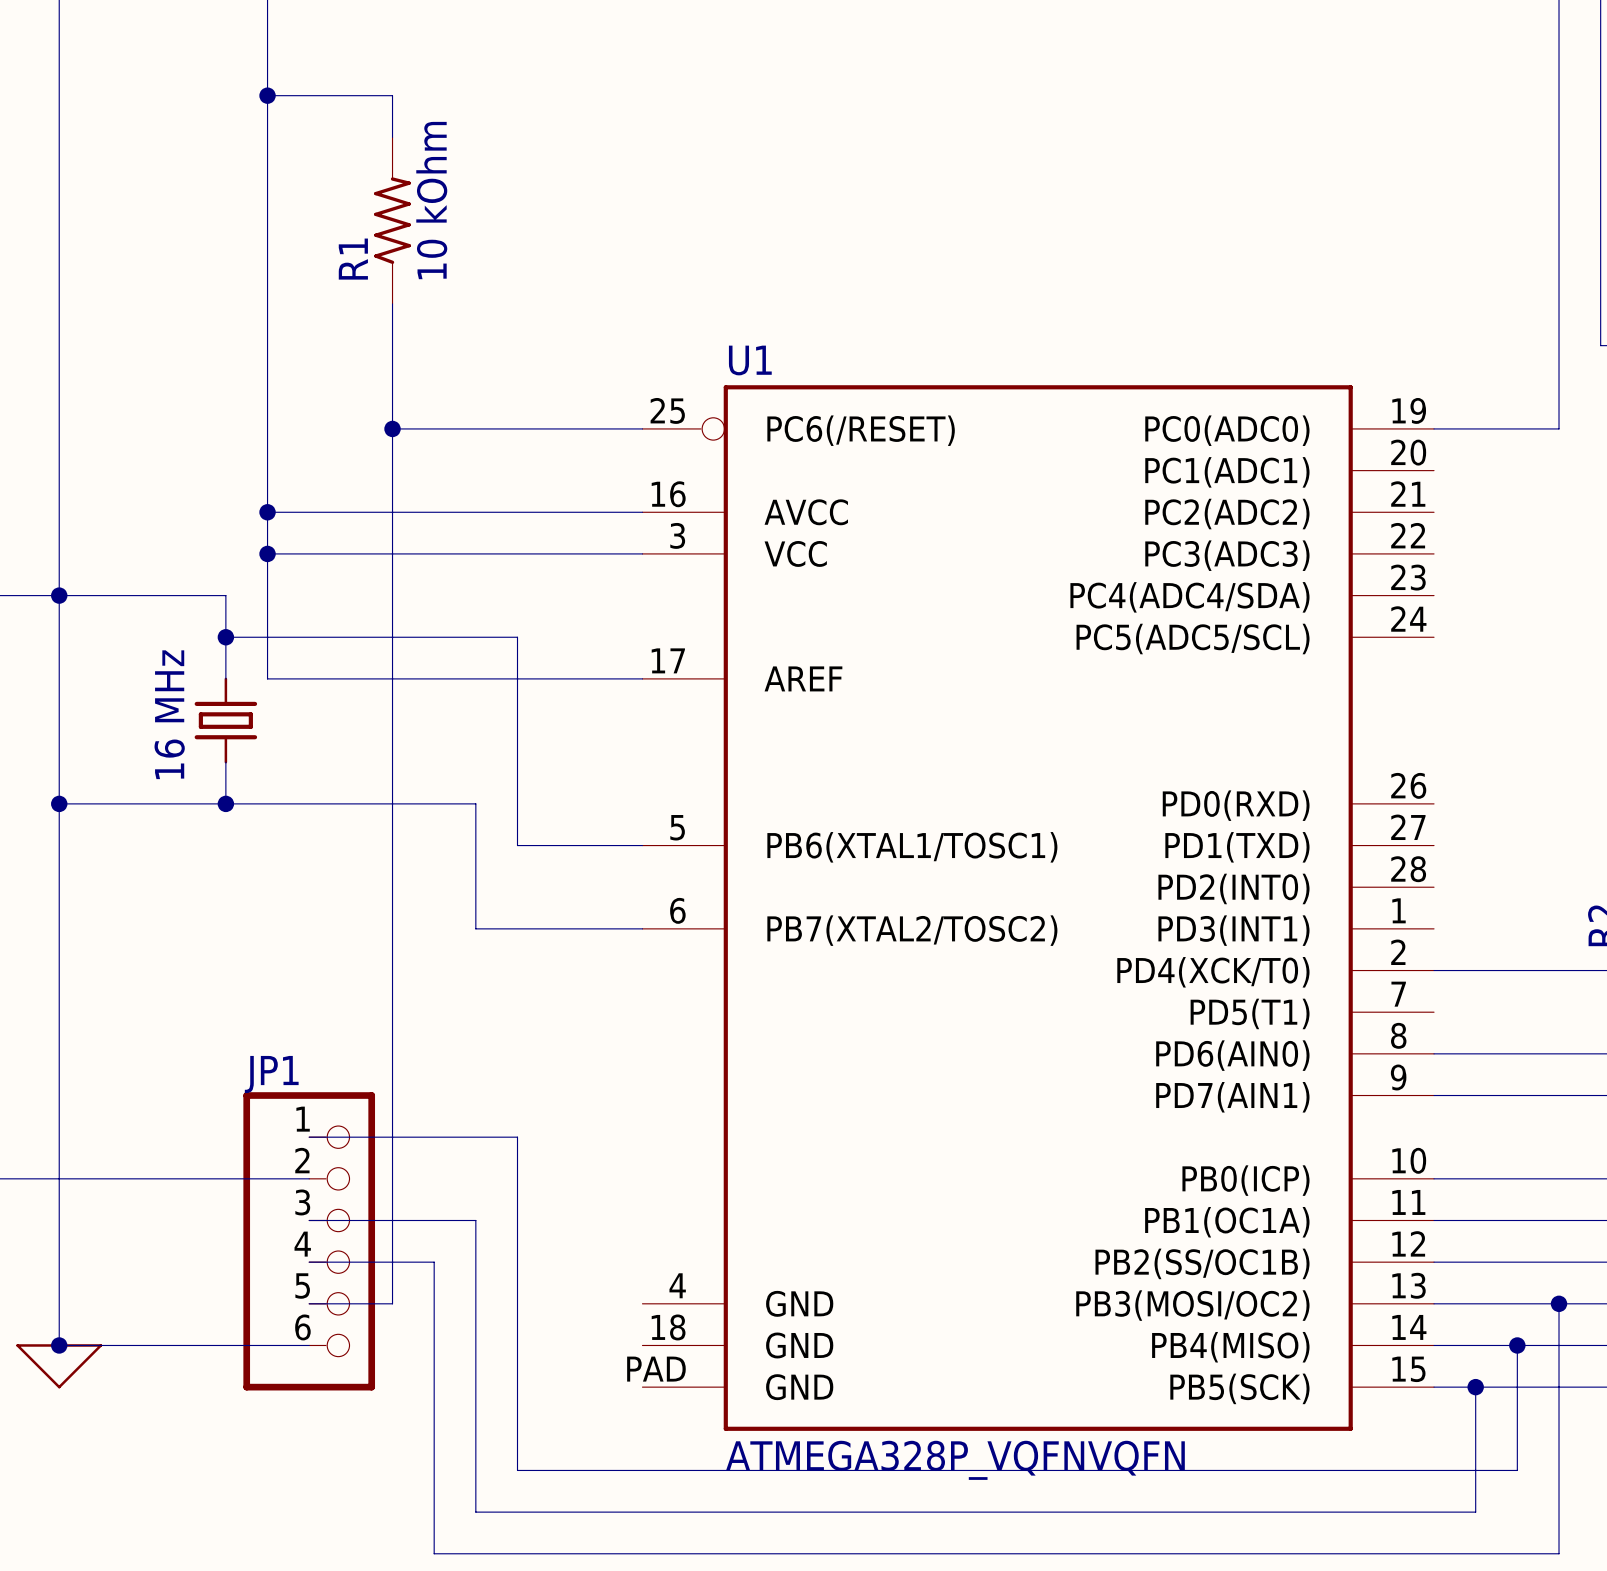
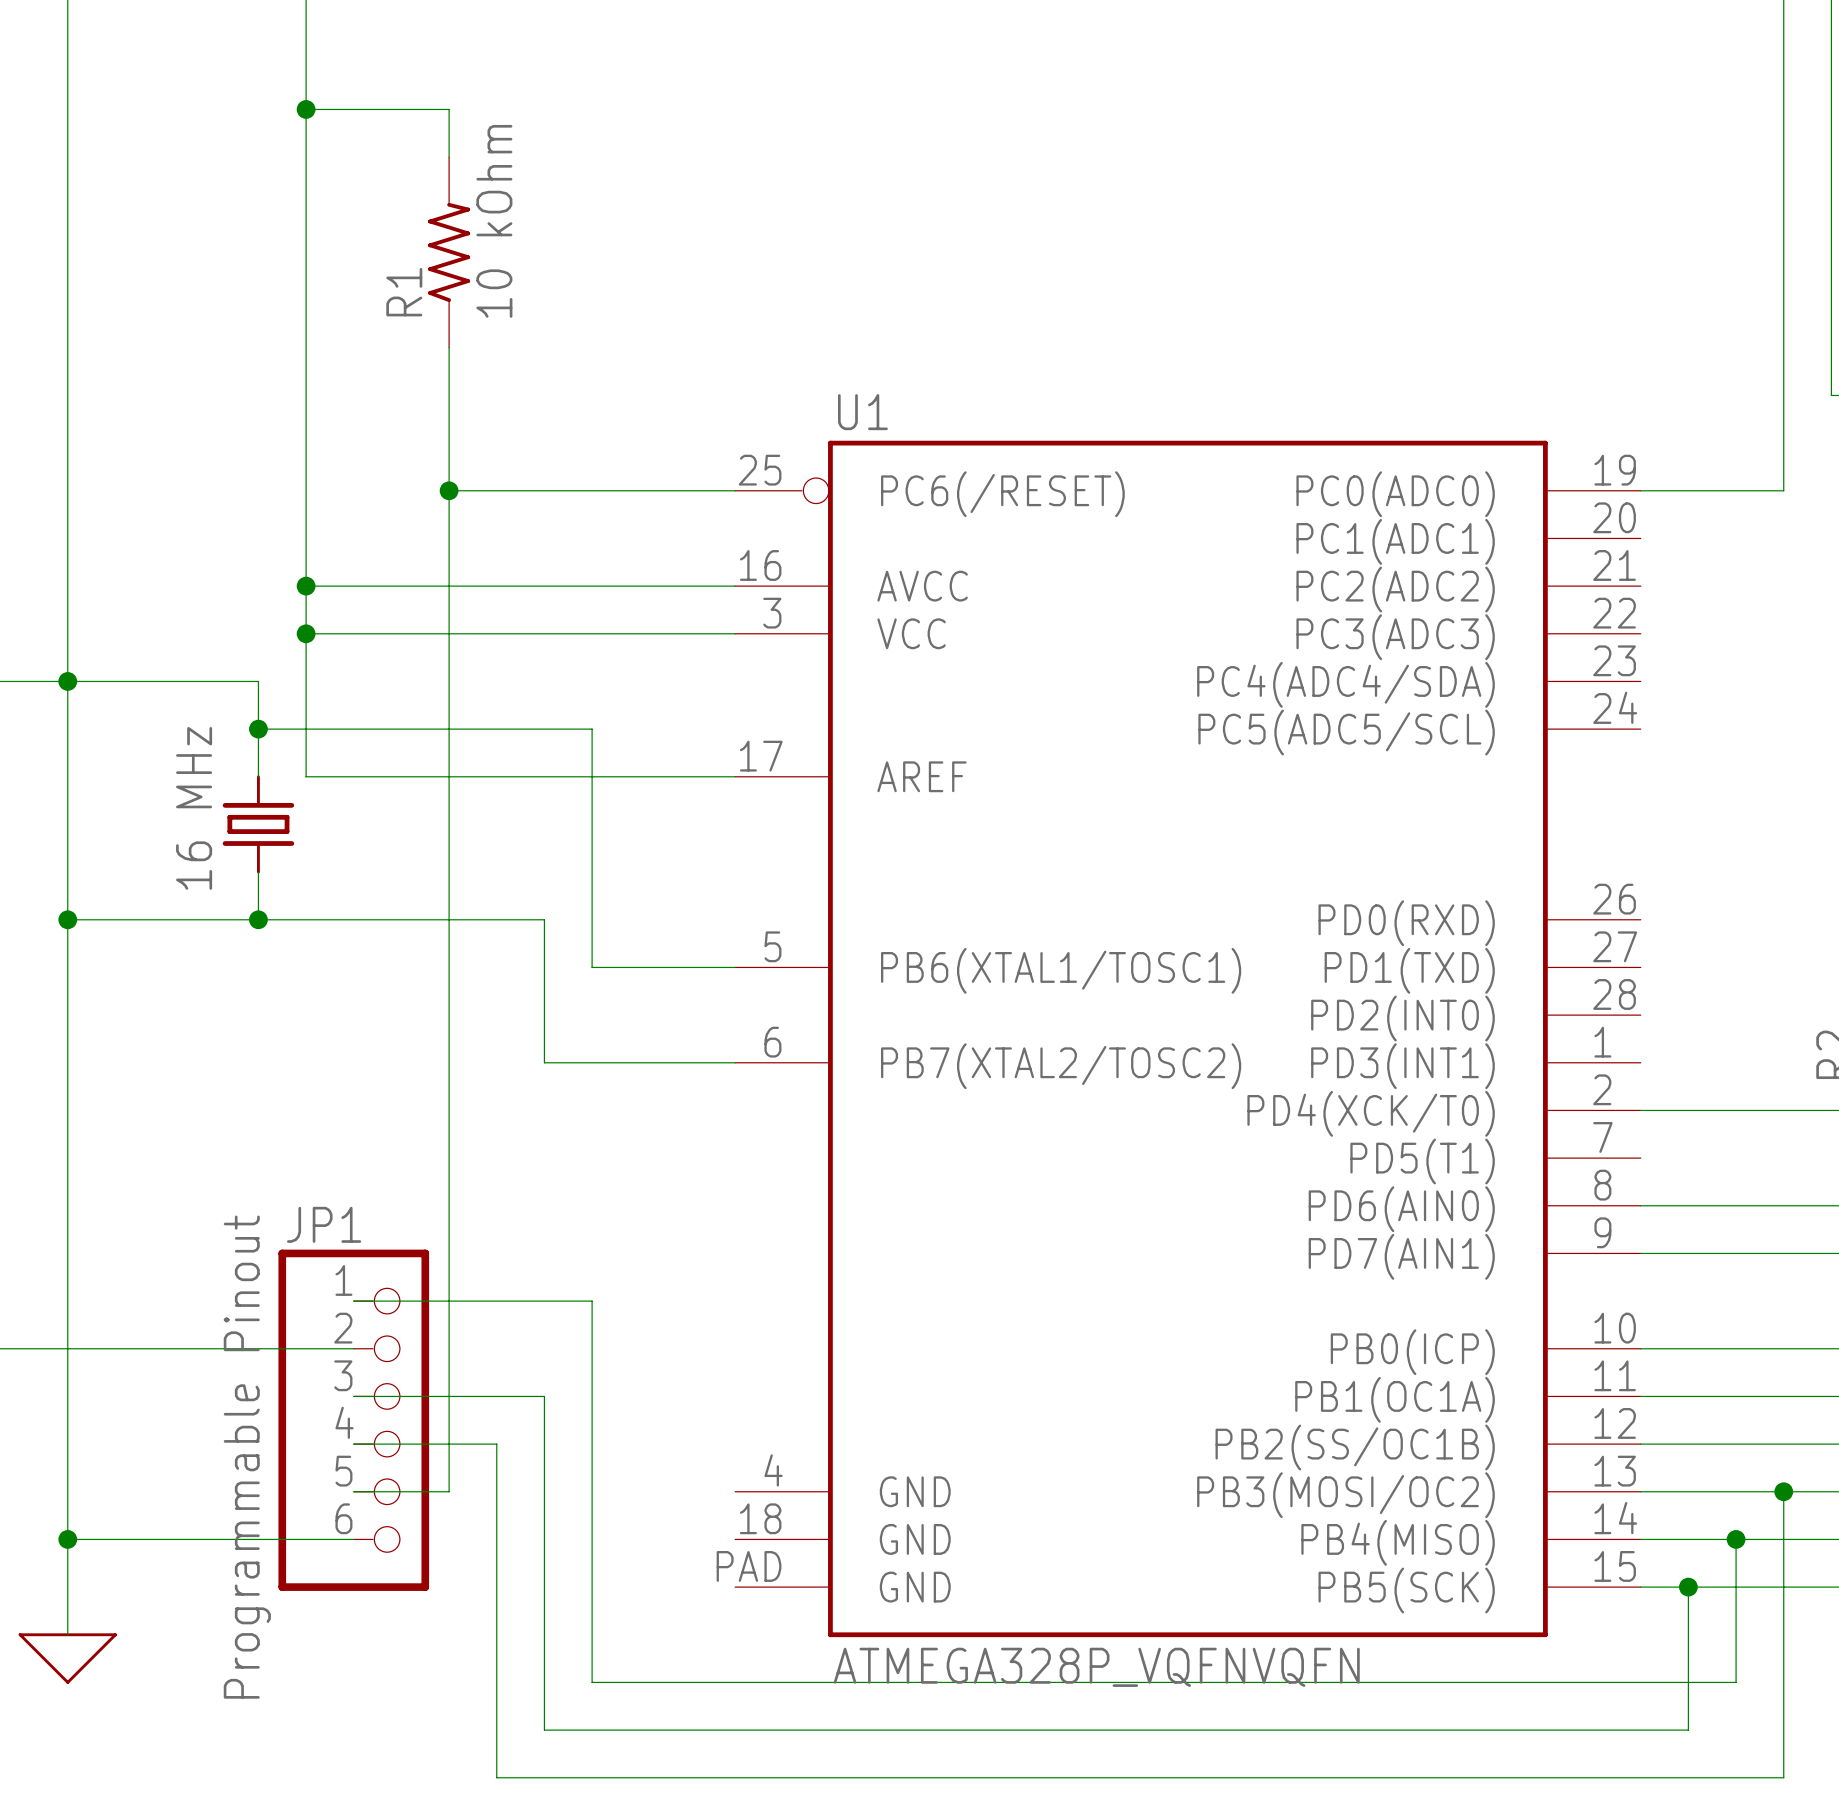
JP1 value: none -> Programmable Pinout (247, 1457)
wire: none -> (67, 1539) (67, 1634)
power symbol position: (59, 1366) -> (67, 1658)

